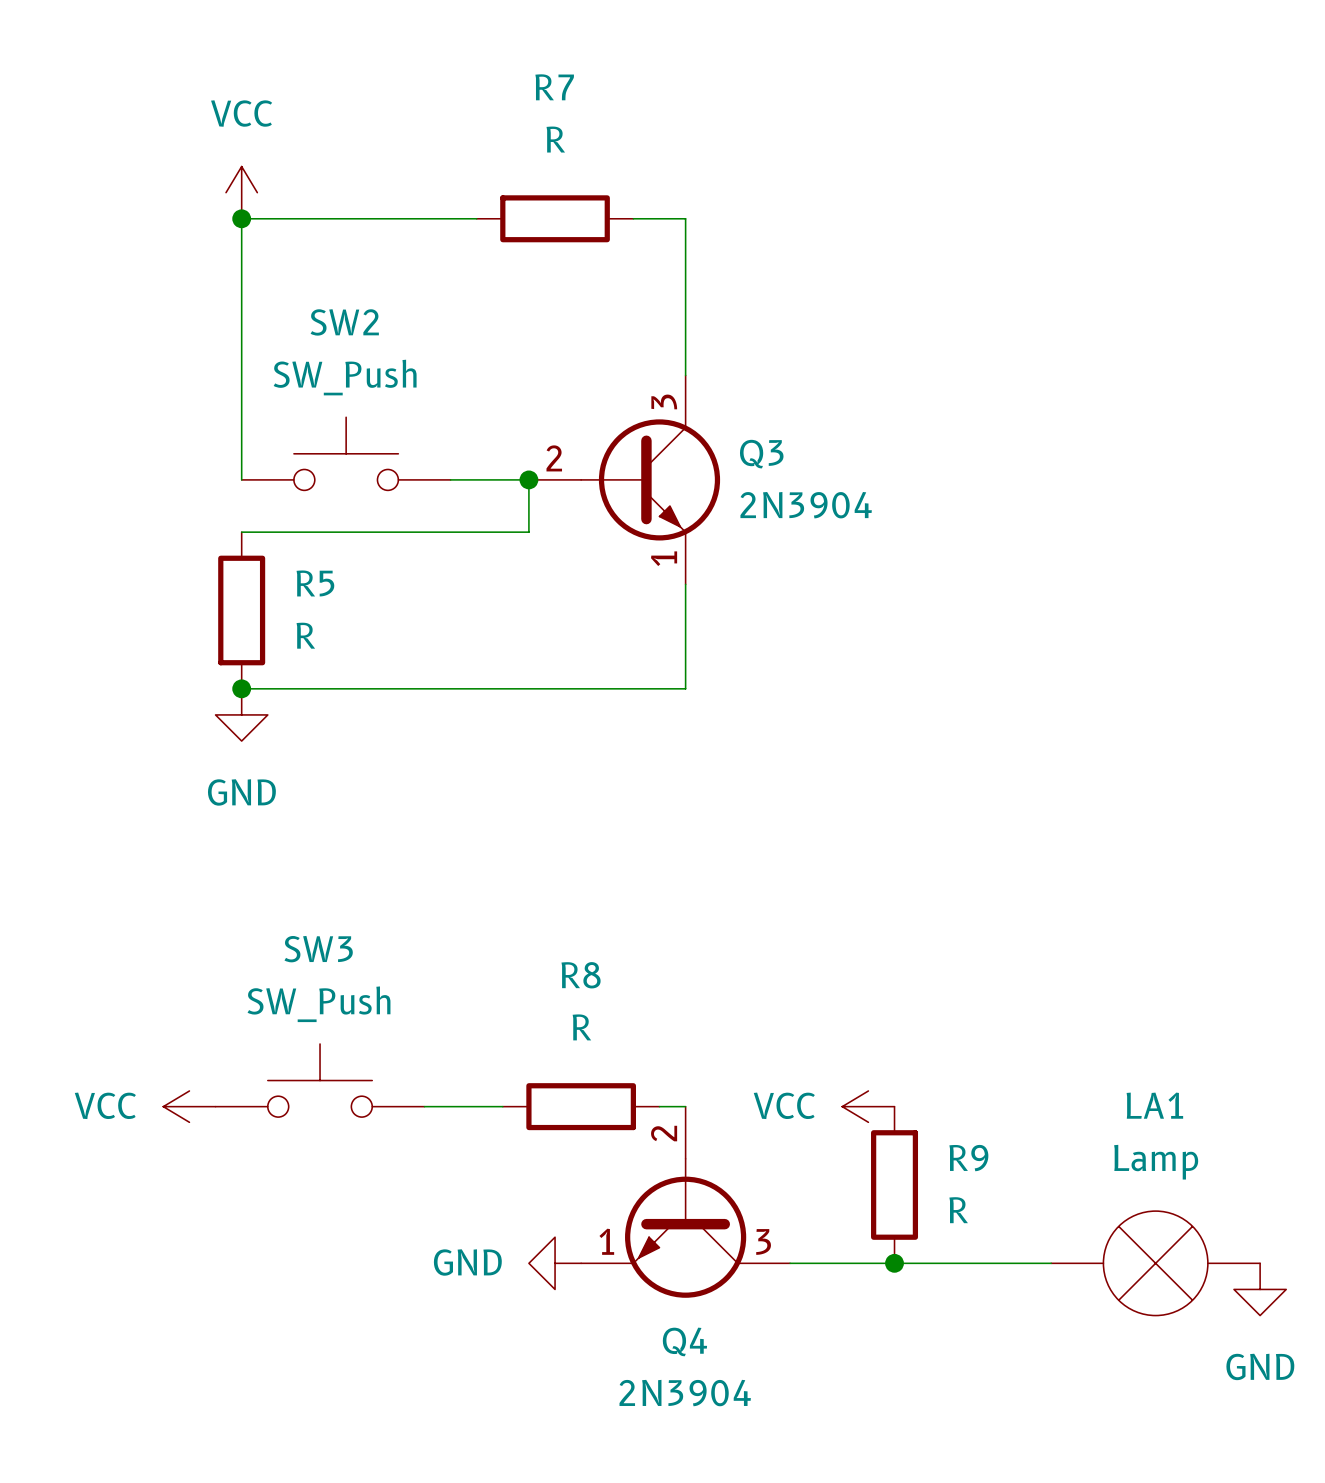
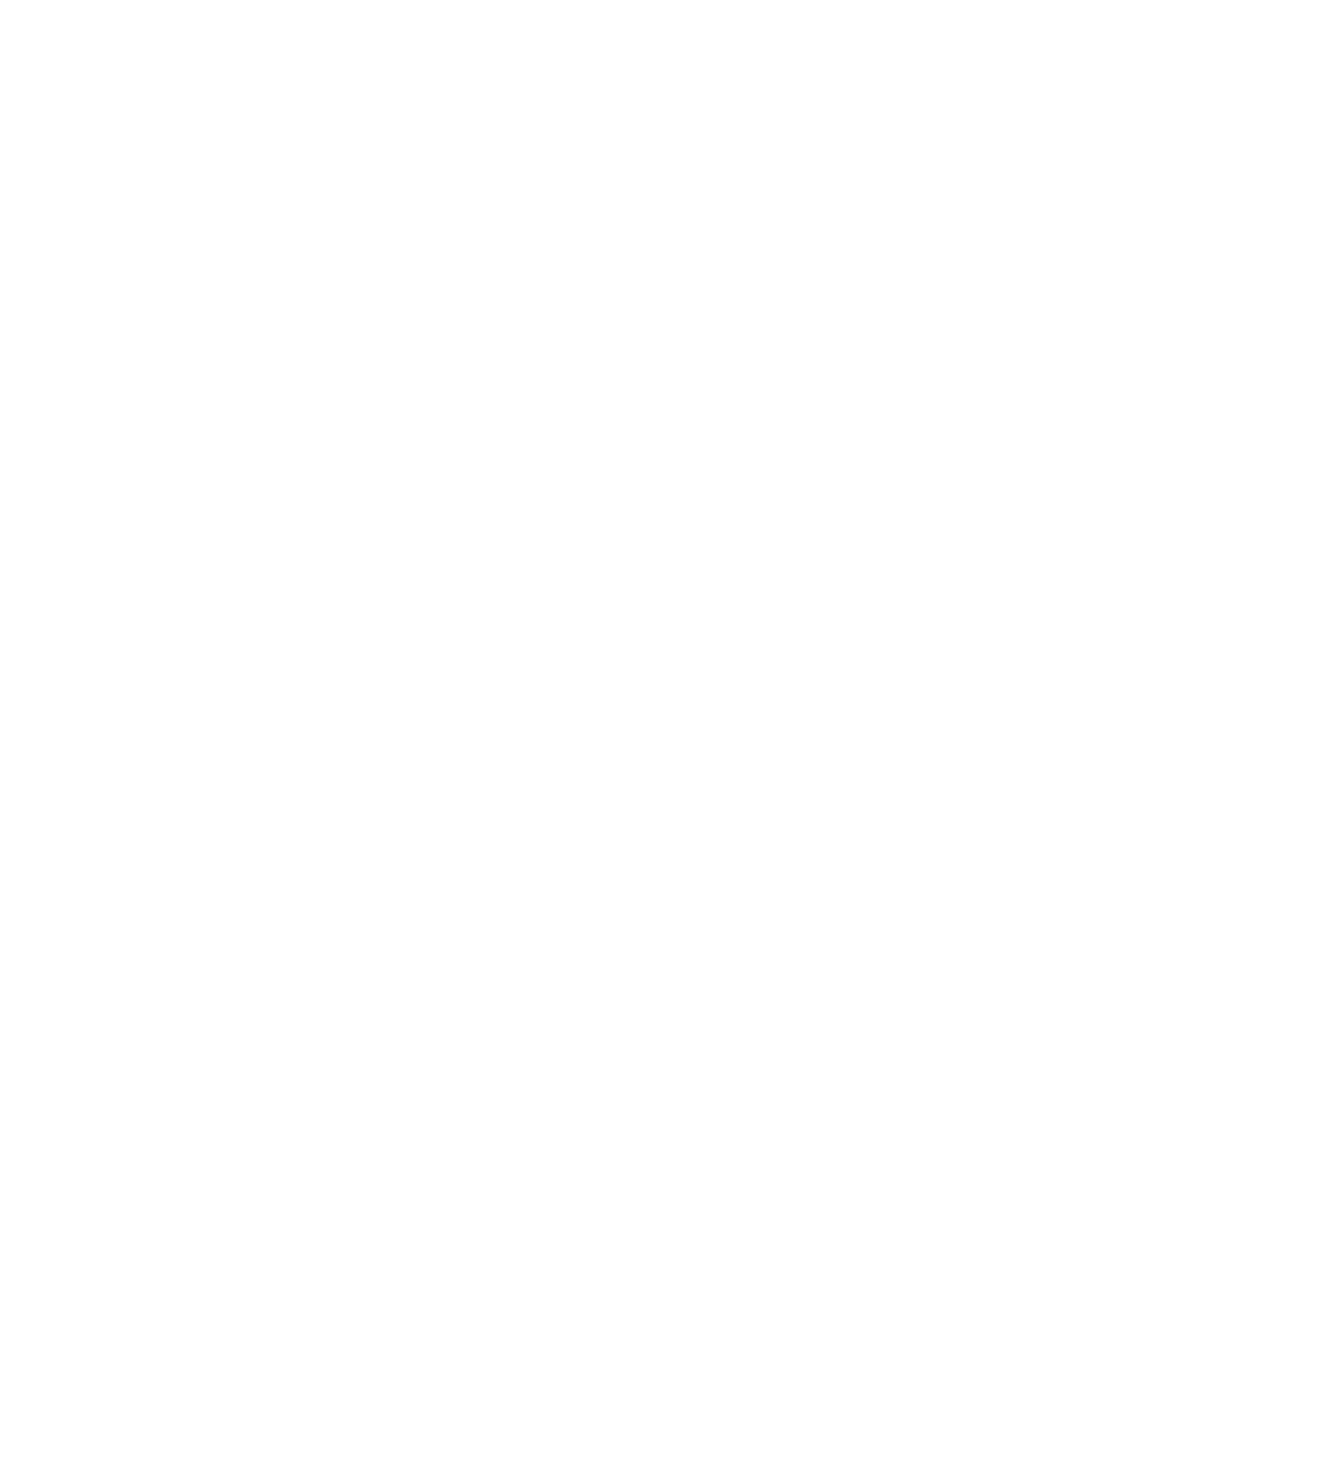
power symbol: VCC (241, 192) -> none
junction: (241, 218) -> none
wire: (476, 218) (241, 218) (241, 479) -> none
R7: R (555, 218) -> none
wire: (633, 218) (685, 218) (685, 375) -> none
SW2: SW_Push (346, 453) -> none
wire: (450, 479) (528, 479) (528, 532) (241, 532) -> none
junction: (528, 479) -> none
Q3: 2N3904 (624, 479) -> none
wire: (685, 584) (685, 688) (241, 688) -> none
R5: R (241, 610) -> none
junction: (241, 688) -> none
power symbol: GND (241, 714) -> none
SW3: SW_Push (320, 1080) -> none
power symbol: VCC (189, 1106) -> none
wire: (424, 1106) (502, 1106) -> none
R8: R (581, 1106) -> none
wire: (659, 1106) (685, 1106) -> none
power symbol: VCC (868, 1106) -> none
R9: R (894, 1184) -> none
Q4: 2N3904 (685, 1202) -> none
power symbol: GND (555, 1263) -> none
wire: (790, 1263) (1051, 1263) -> none
junction: (894, 1263) -> none
LA1: Lamp (1155, 1263) -> none
power symbol: GND (1260, 1289) -> none

